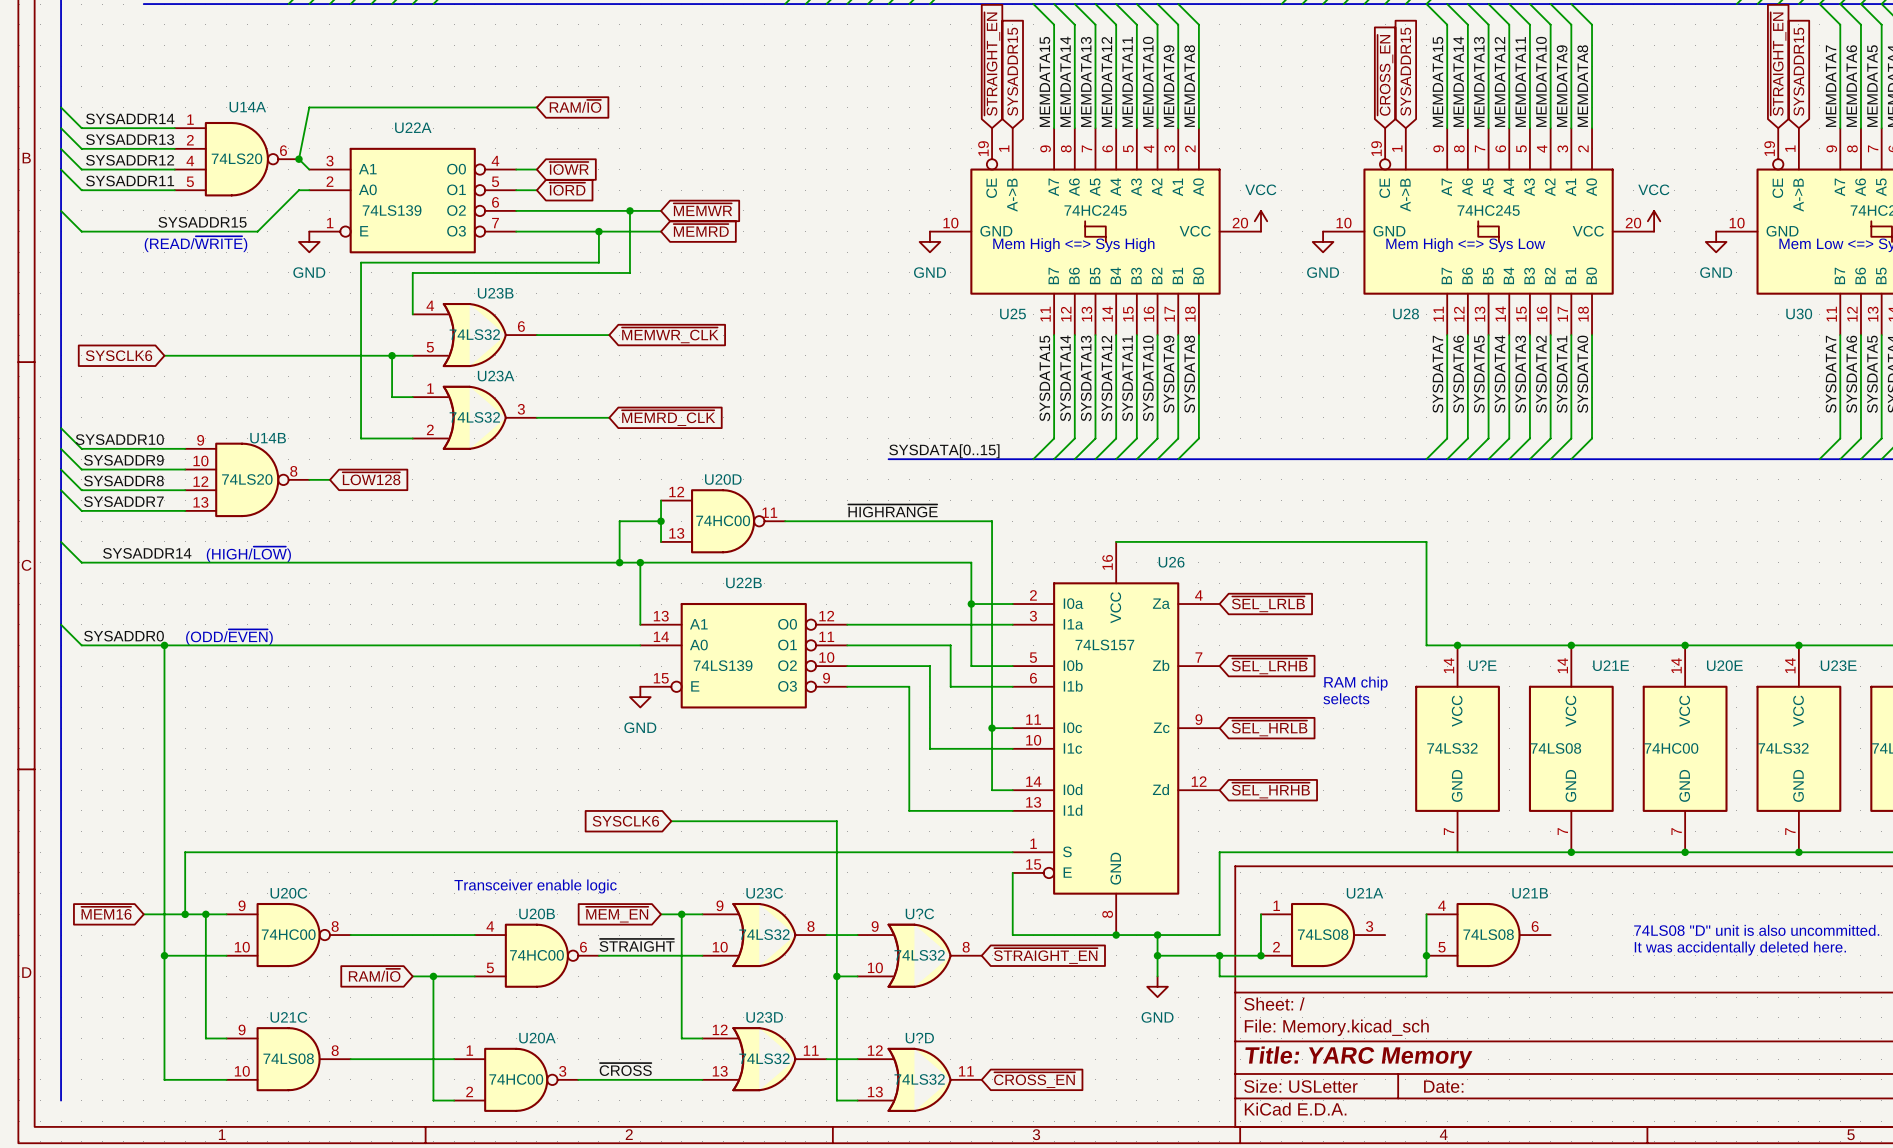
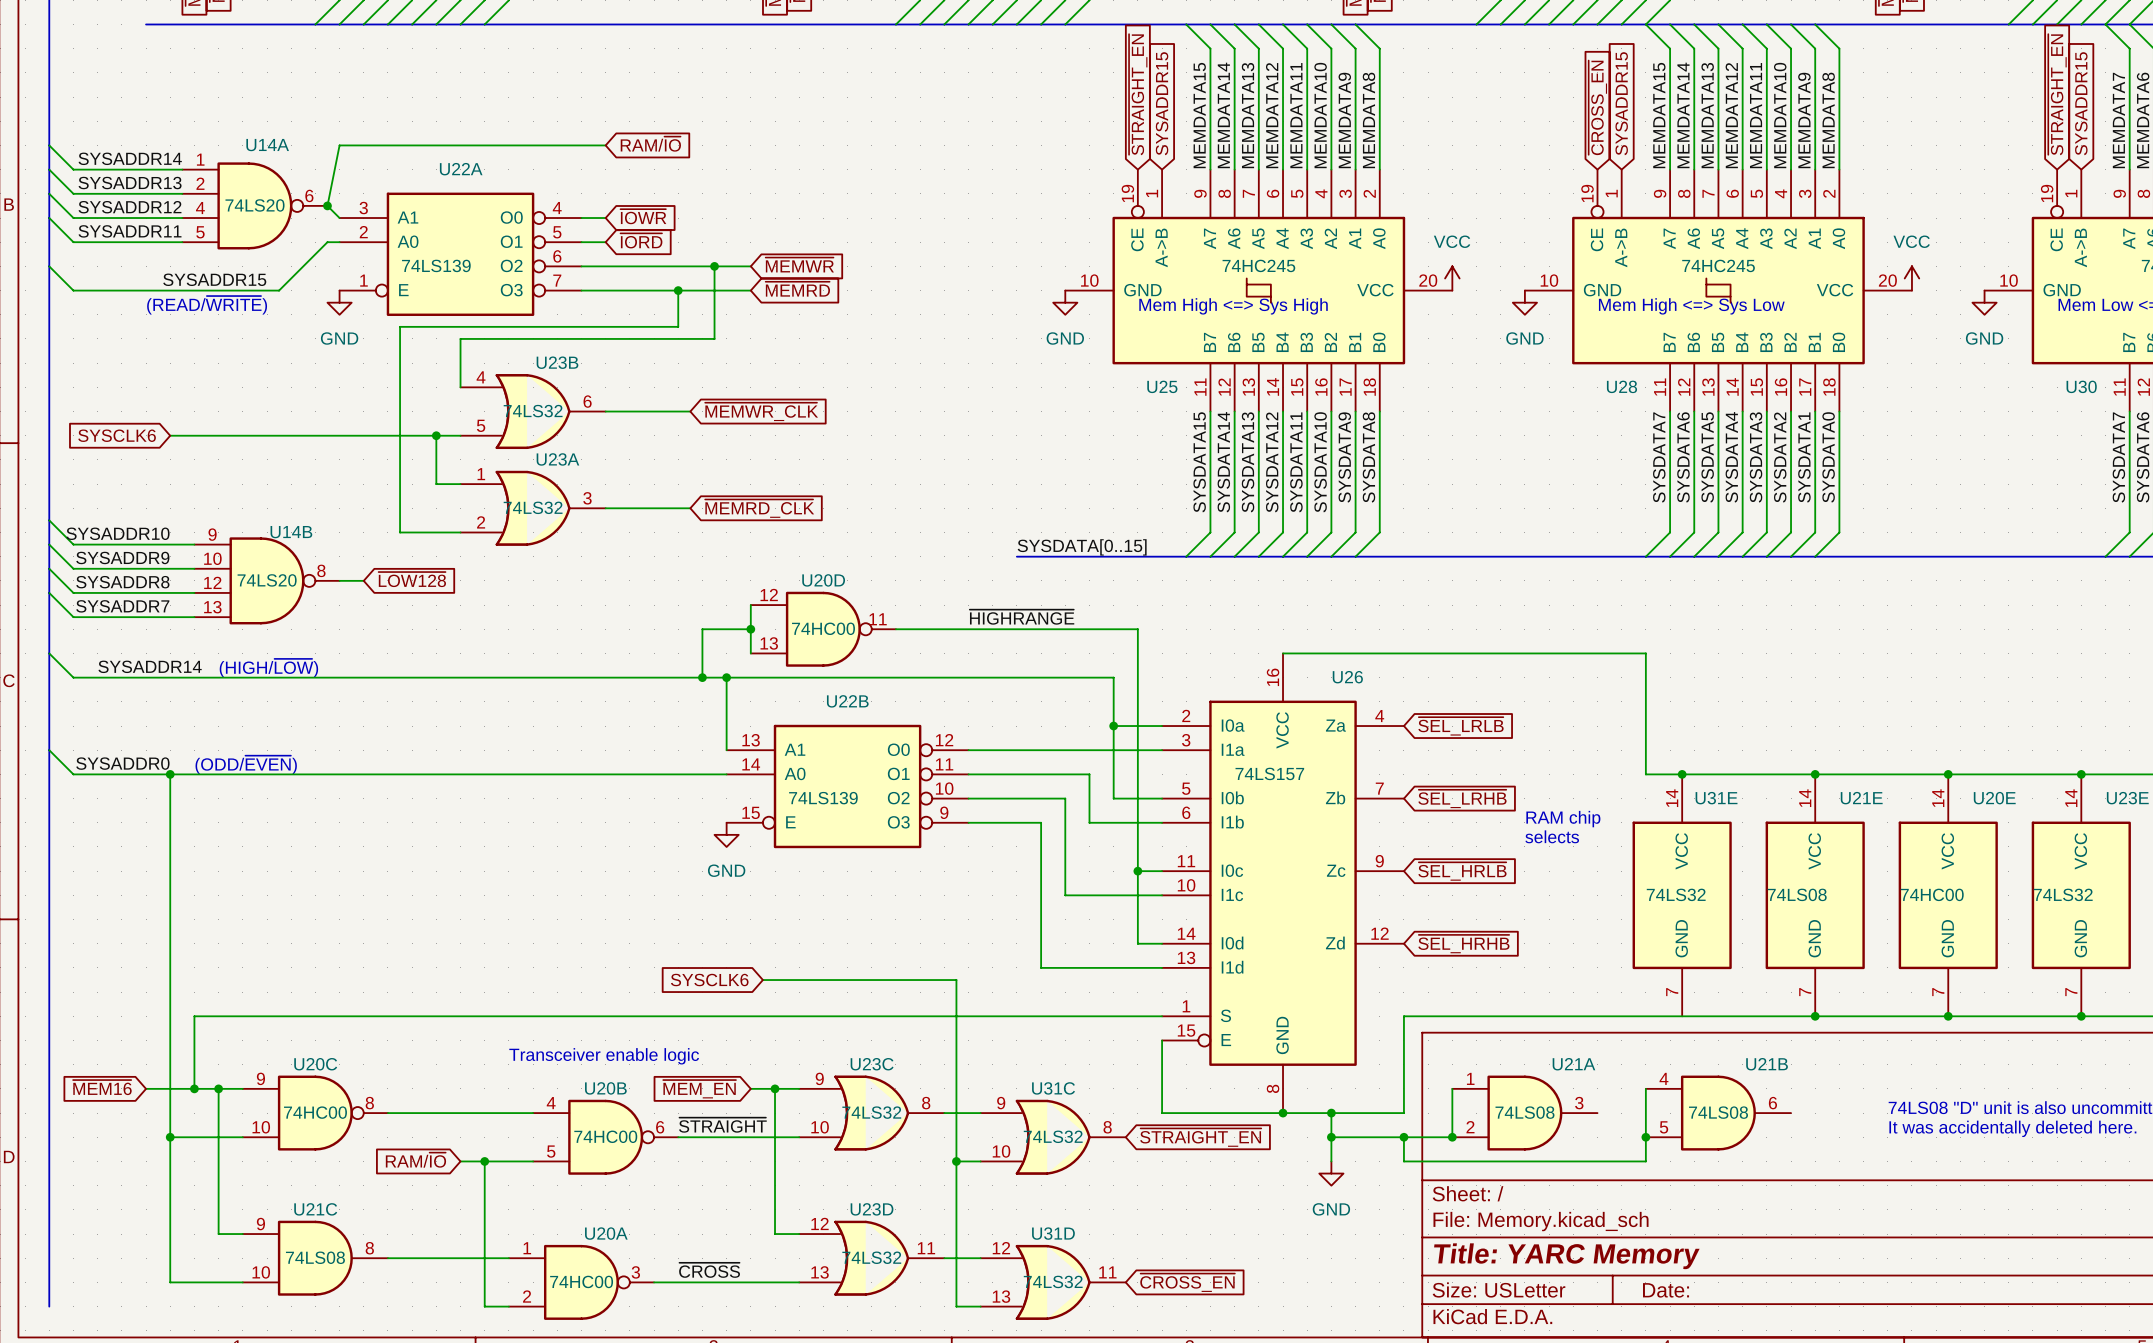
U?E name: U?E (1482, 665) -> U31E (1716, 798)
U?C name: U?C (919, 913) -> U31C (1053, 1088)
U?D name: U?D (919, 1038) -> U31D (1053, 1233)

